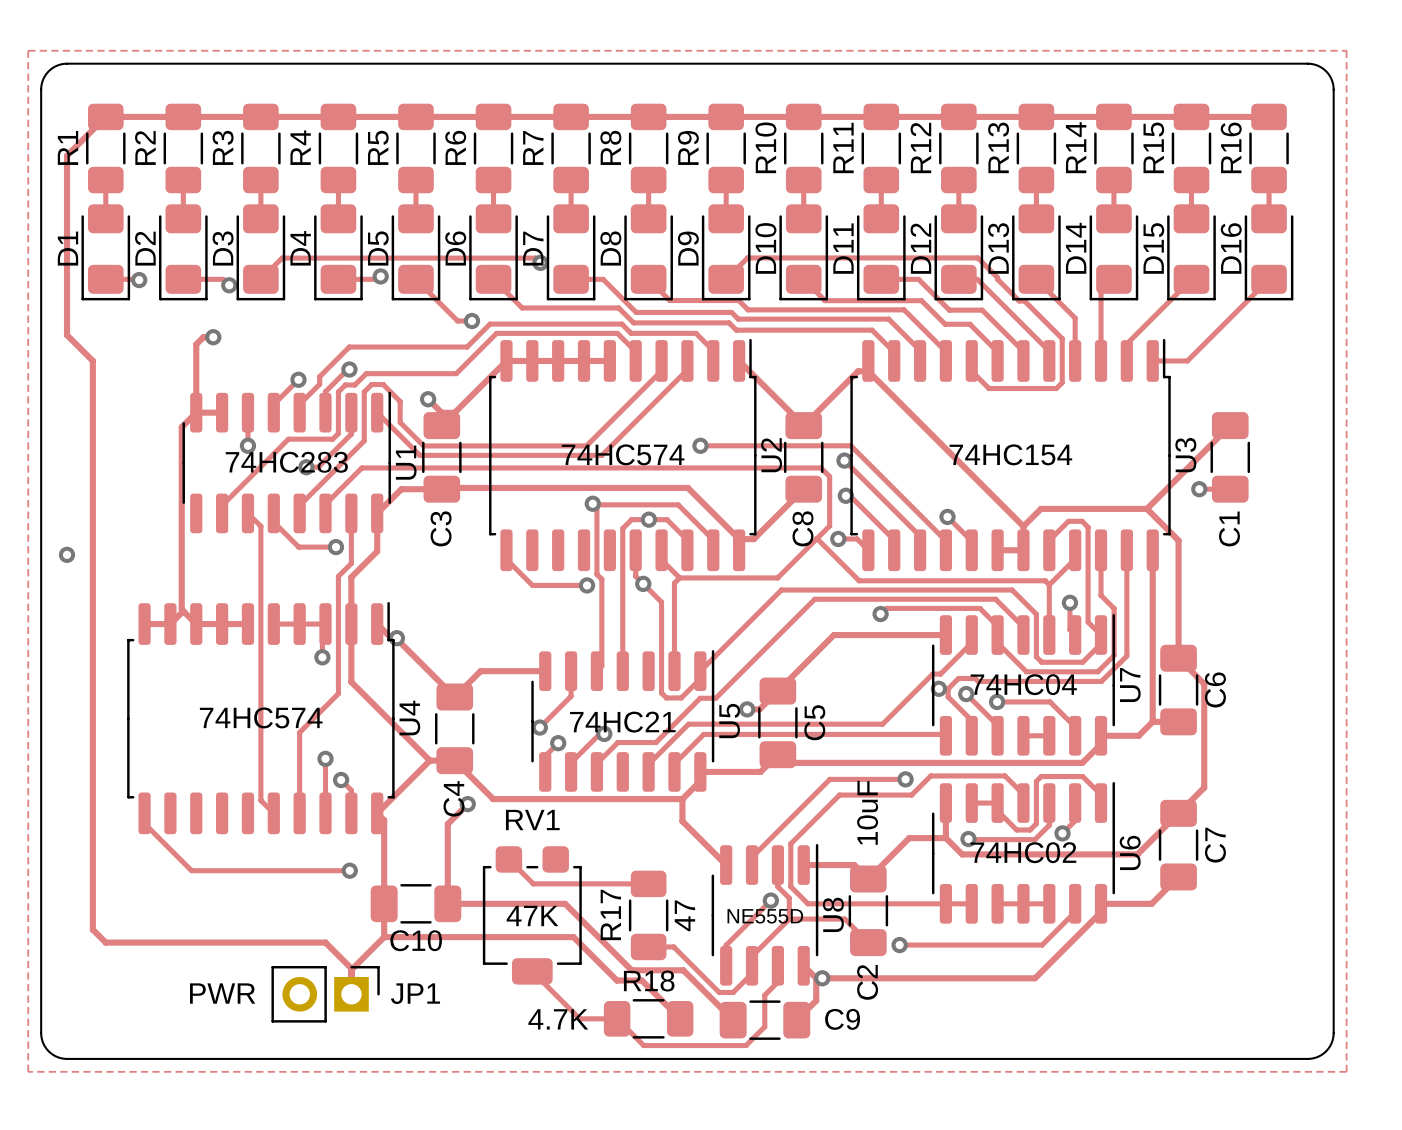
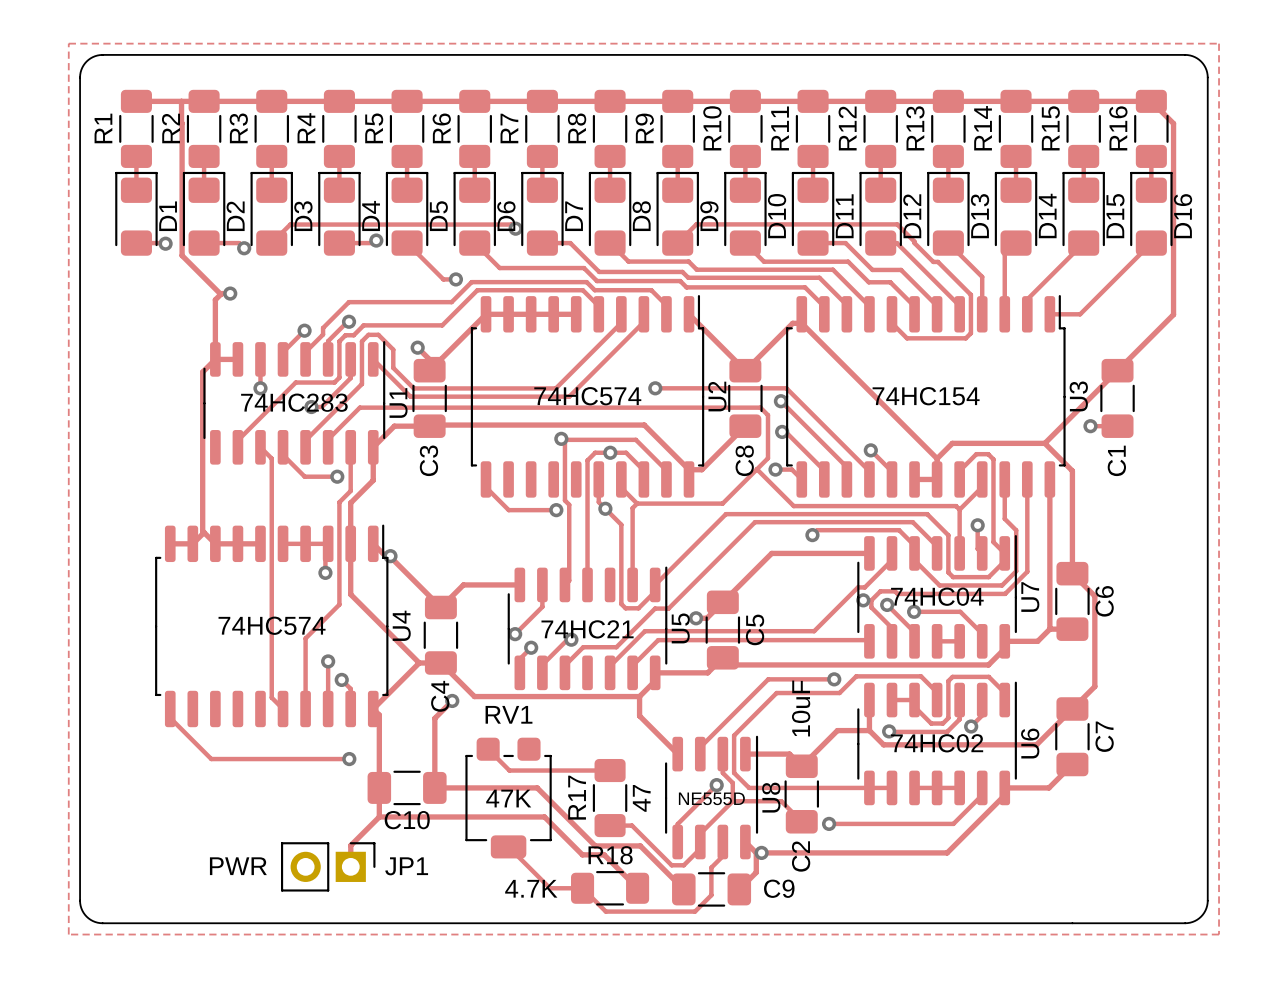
track: (105, 116) (67, 155) (67, 335) (92, 360) (92, 929) (105, 942) (325, 942) (351, 969) -> none
track: none -> (181, 101) (182, 255) (220, 294)
track: none -> (1151, 101) (1173, 123) (1173, 314) (1117, 370)
D1 rotation: 0° (105, 252) -> 180° (136, 213)
D2 rotation: 0° (183, 252) -> 180° (204, 213)
D3 rotation: 0° (260, 252) -> 180° (271, 213)
D4 rotation: 0° (338, 252) -> 180° (339, 213)
D5 rotation: 0° (415, 252) -> 180° (407, 213)
D6 rotation: 0° (493, 252) -> 180° (474, 213)
D7 rotation: 0° (571, 252) -> 180° (542, 213)
D8 rotation: 0° (648, 252) -> 180° (610, 213)
D9 rotation: 0° (726, 252) -> 180° (677, 213)
D10 rotation: 0° (803, 252) -> 180° (745, 213)
D11 rotation: 0° (881, 252) -> 180° (813, 213)
D12 rotation: 0° (958, 252) -> 180° (880, 213)
D13 rotation: 0° (1036, 252) -> 180° (948, 213)
D14 rotation: 0° (1113, 252) -> 180° (1016, 213)
D15 rotation: 0° (1191, 252) -> 180° (1083, 213)
D16 rotation: 0° (1269, 252) -> 180° (1151, 213)
via: (67, 554) -> none

